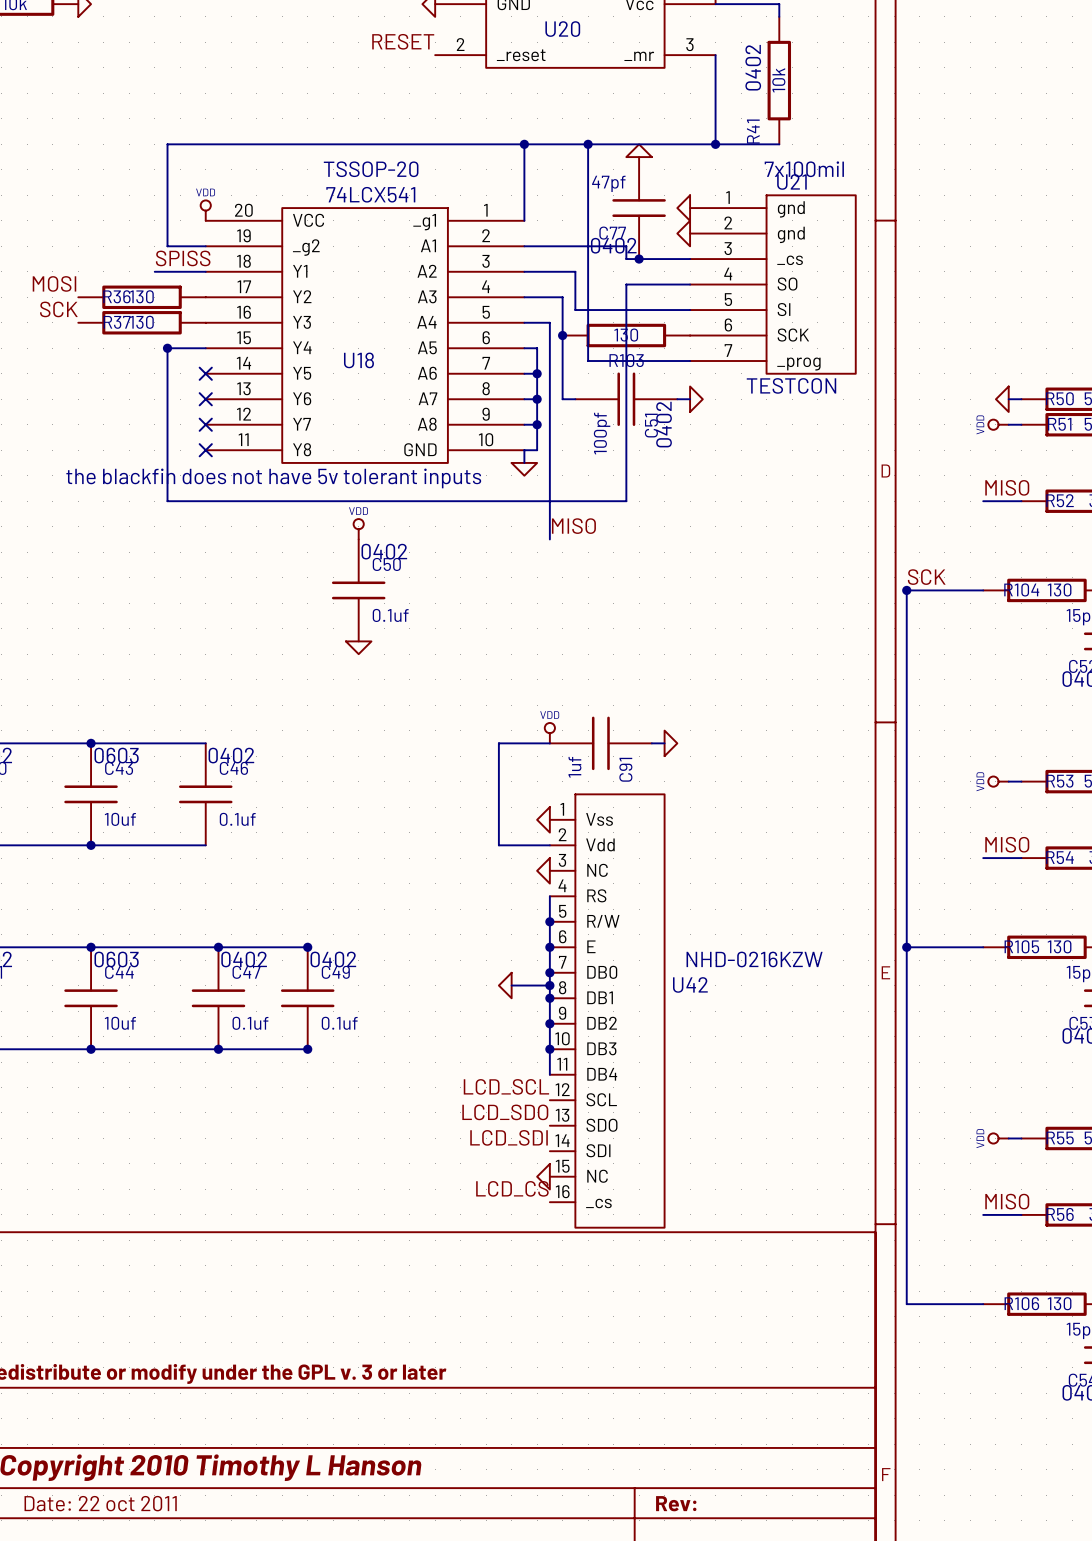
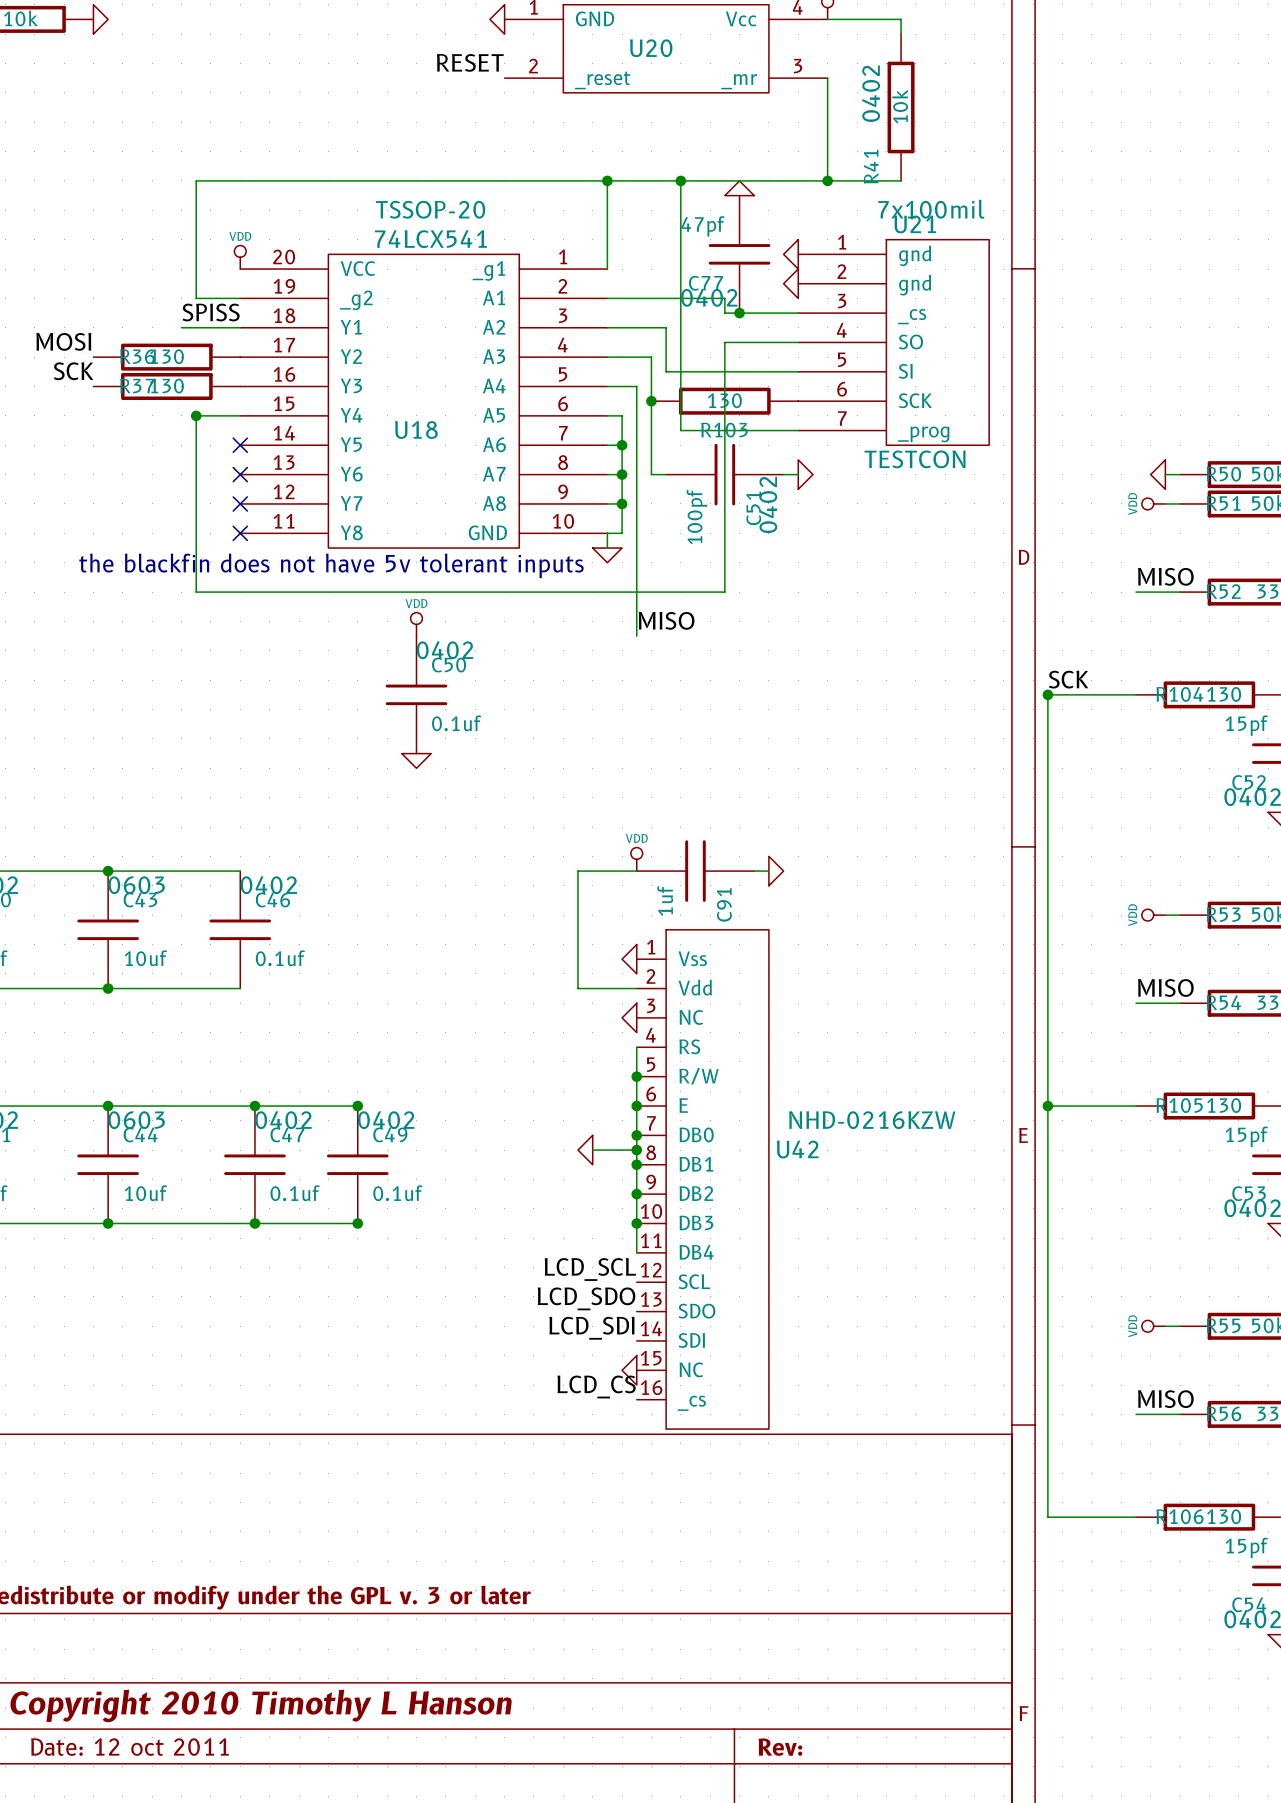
title block: Date: 22 oct 2011 (100, 1503) -> Date: 12 oct 2011 (129, 1747)

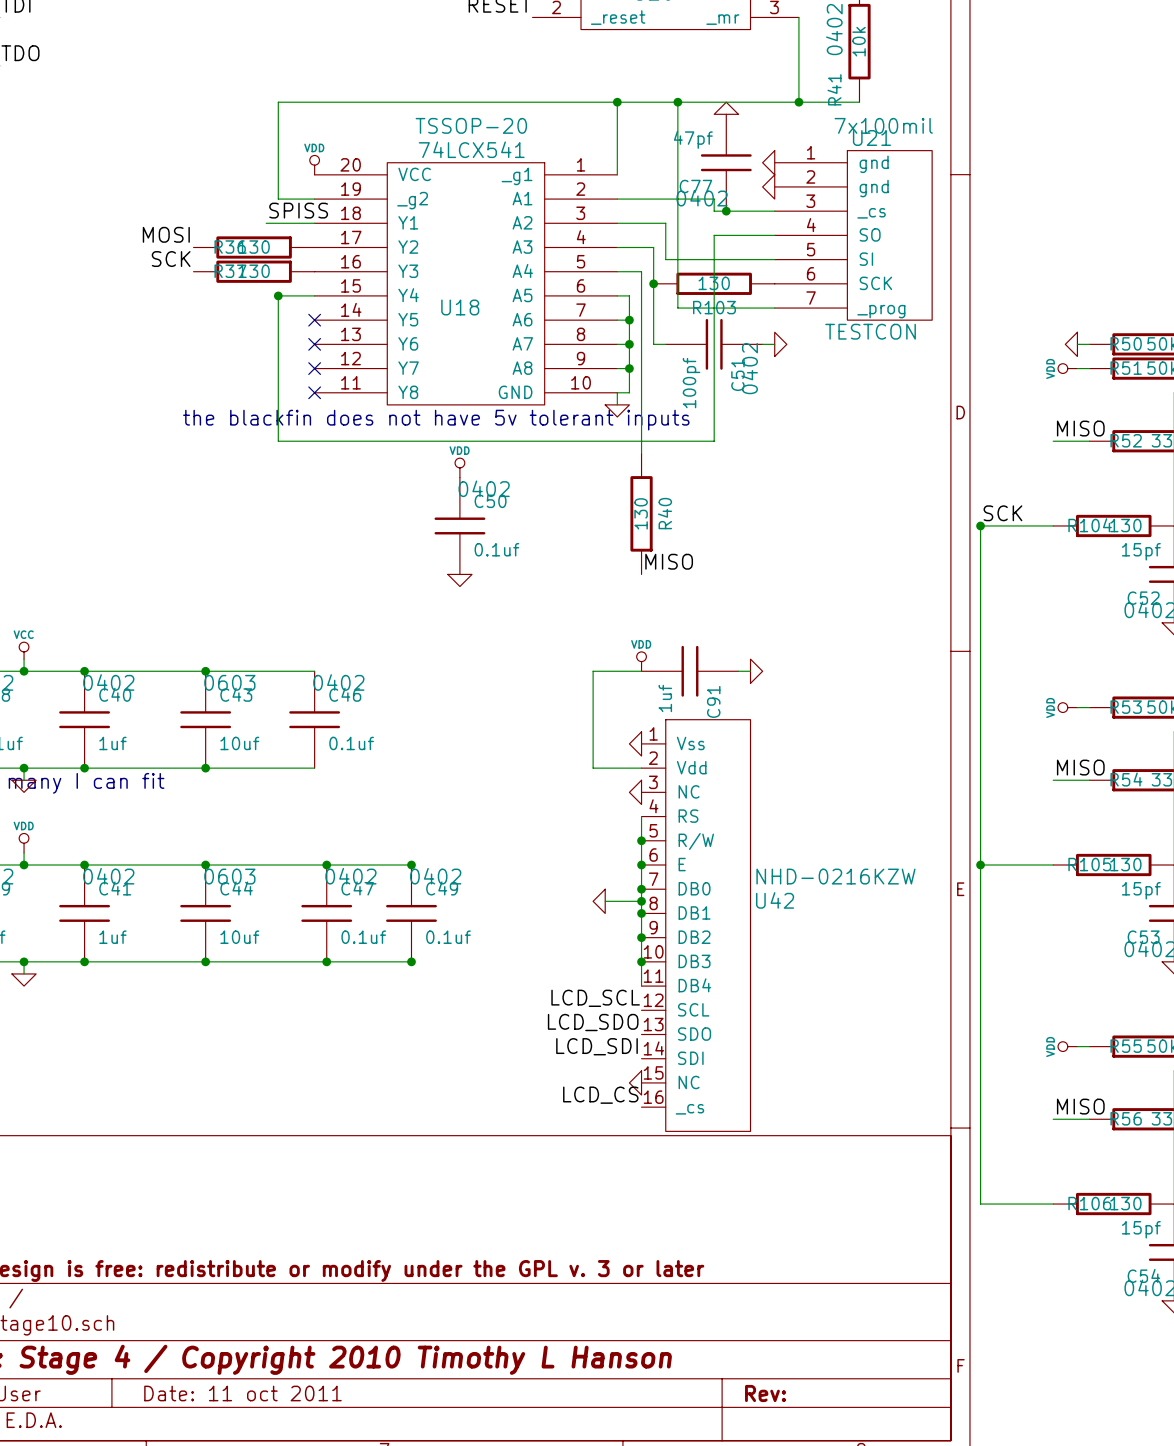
label position: MISO (666, 620) -> MISO (669, 561)
R40: none -> 130 (641, 513)
title block: Date: 12 oct 2011 (129, 1747) -> Date: 11 oct 2011 (242, 1393)

